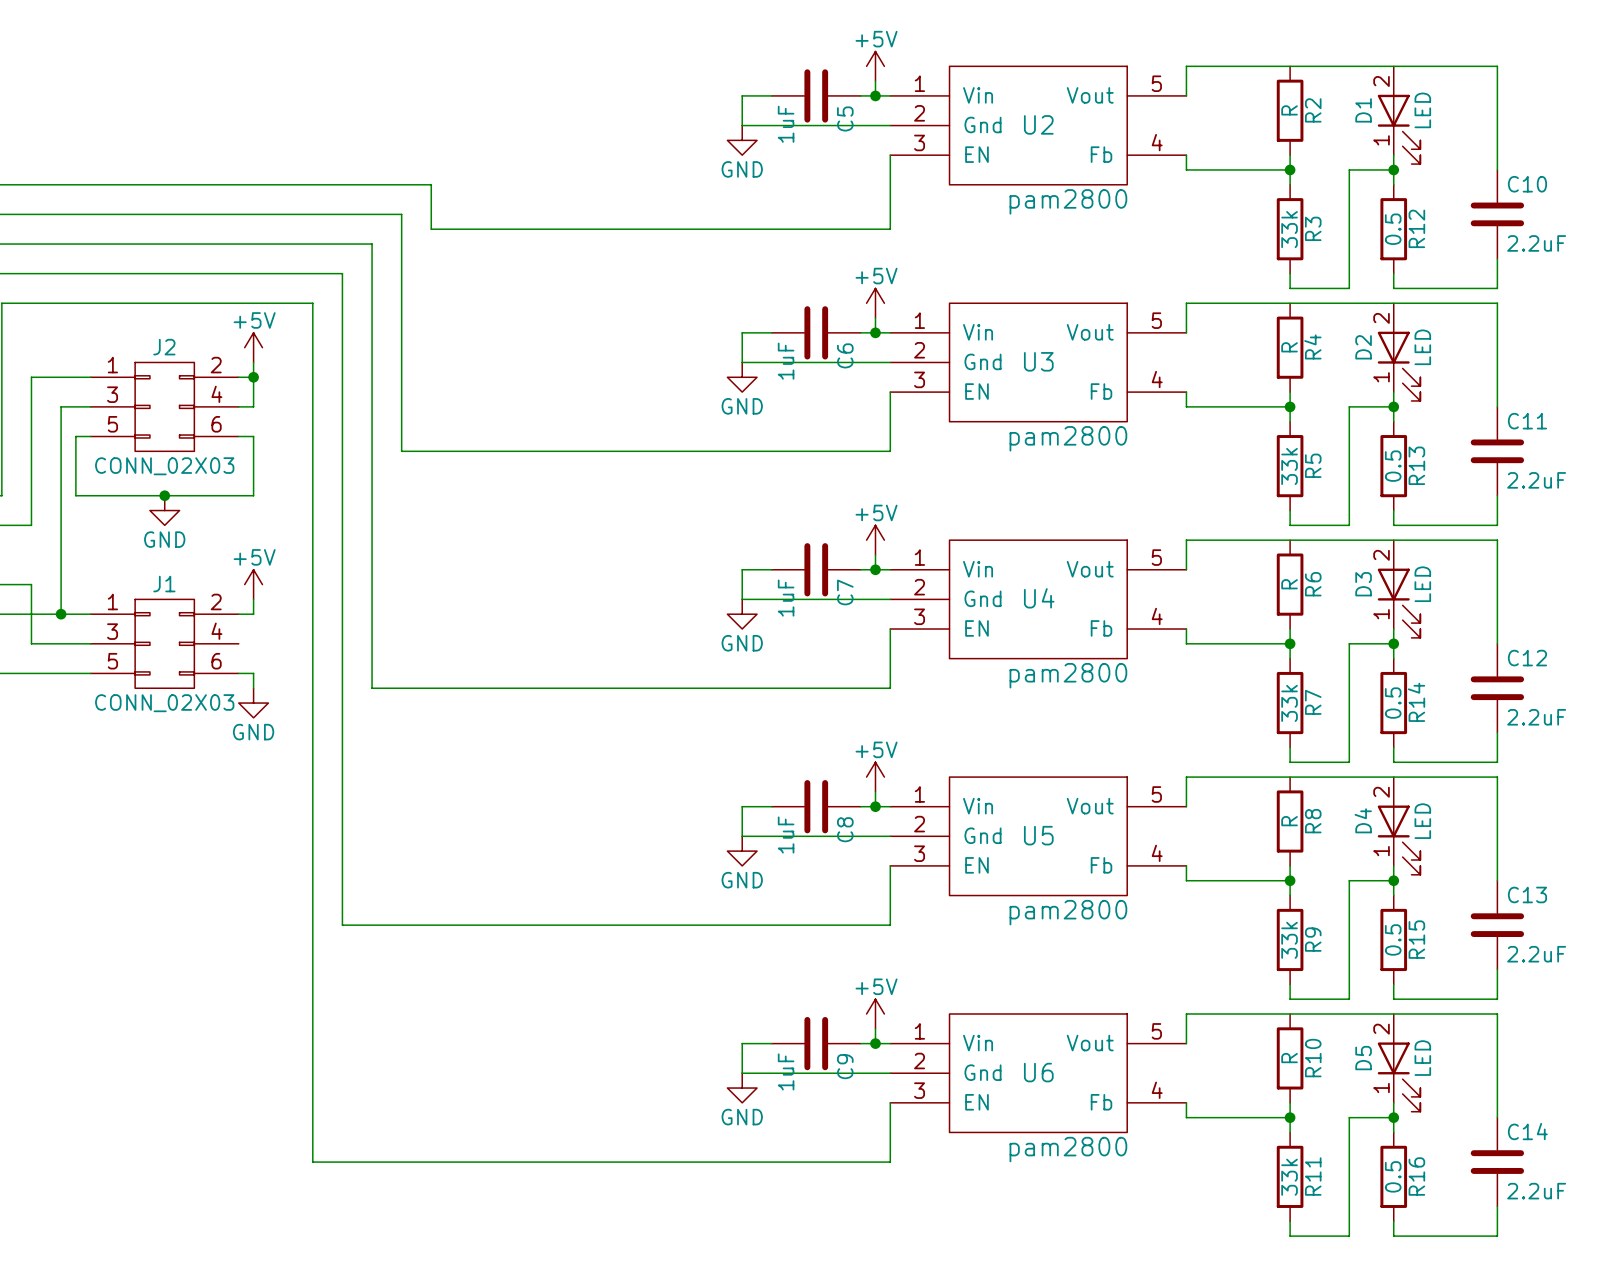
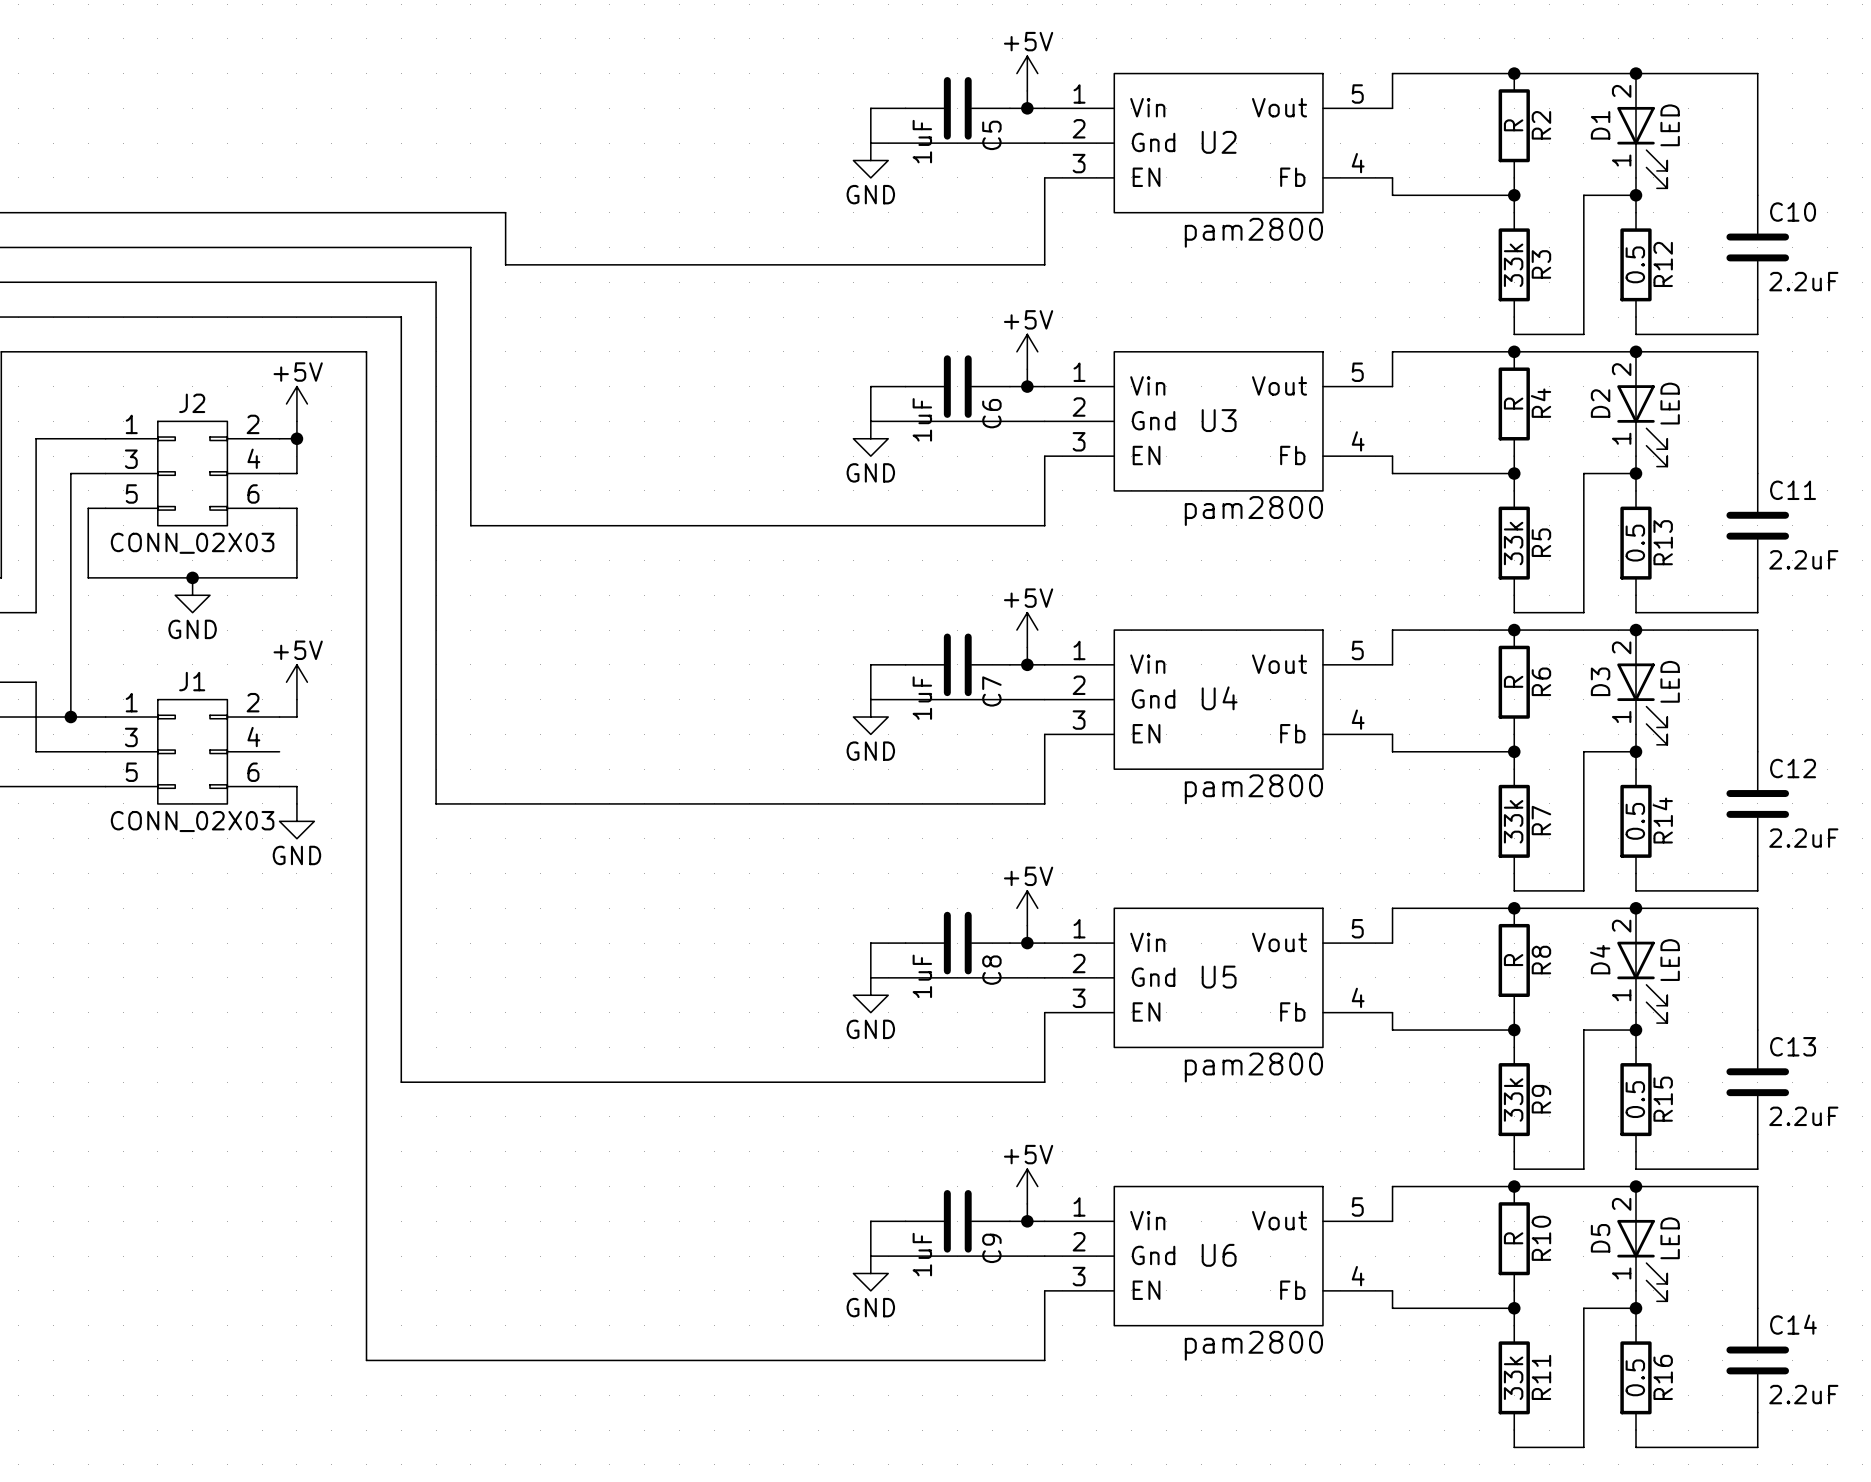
junction: none -> (1514, 73)
junction: none -> (1635, 73)
junction: none -> (1514, 351)
junction: none -> (1635, 351)
junction: none -> (1514, 630)
junction: none -> (1635, 630)
junction: none -> (1514, 908)
junction: none -> (1635, 908)
junction: none -> (1514, 1186)
junction: none -> (1635, 1186)

